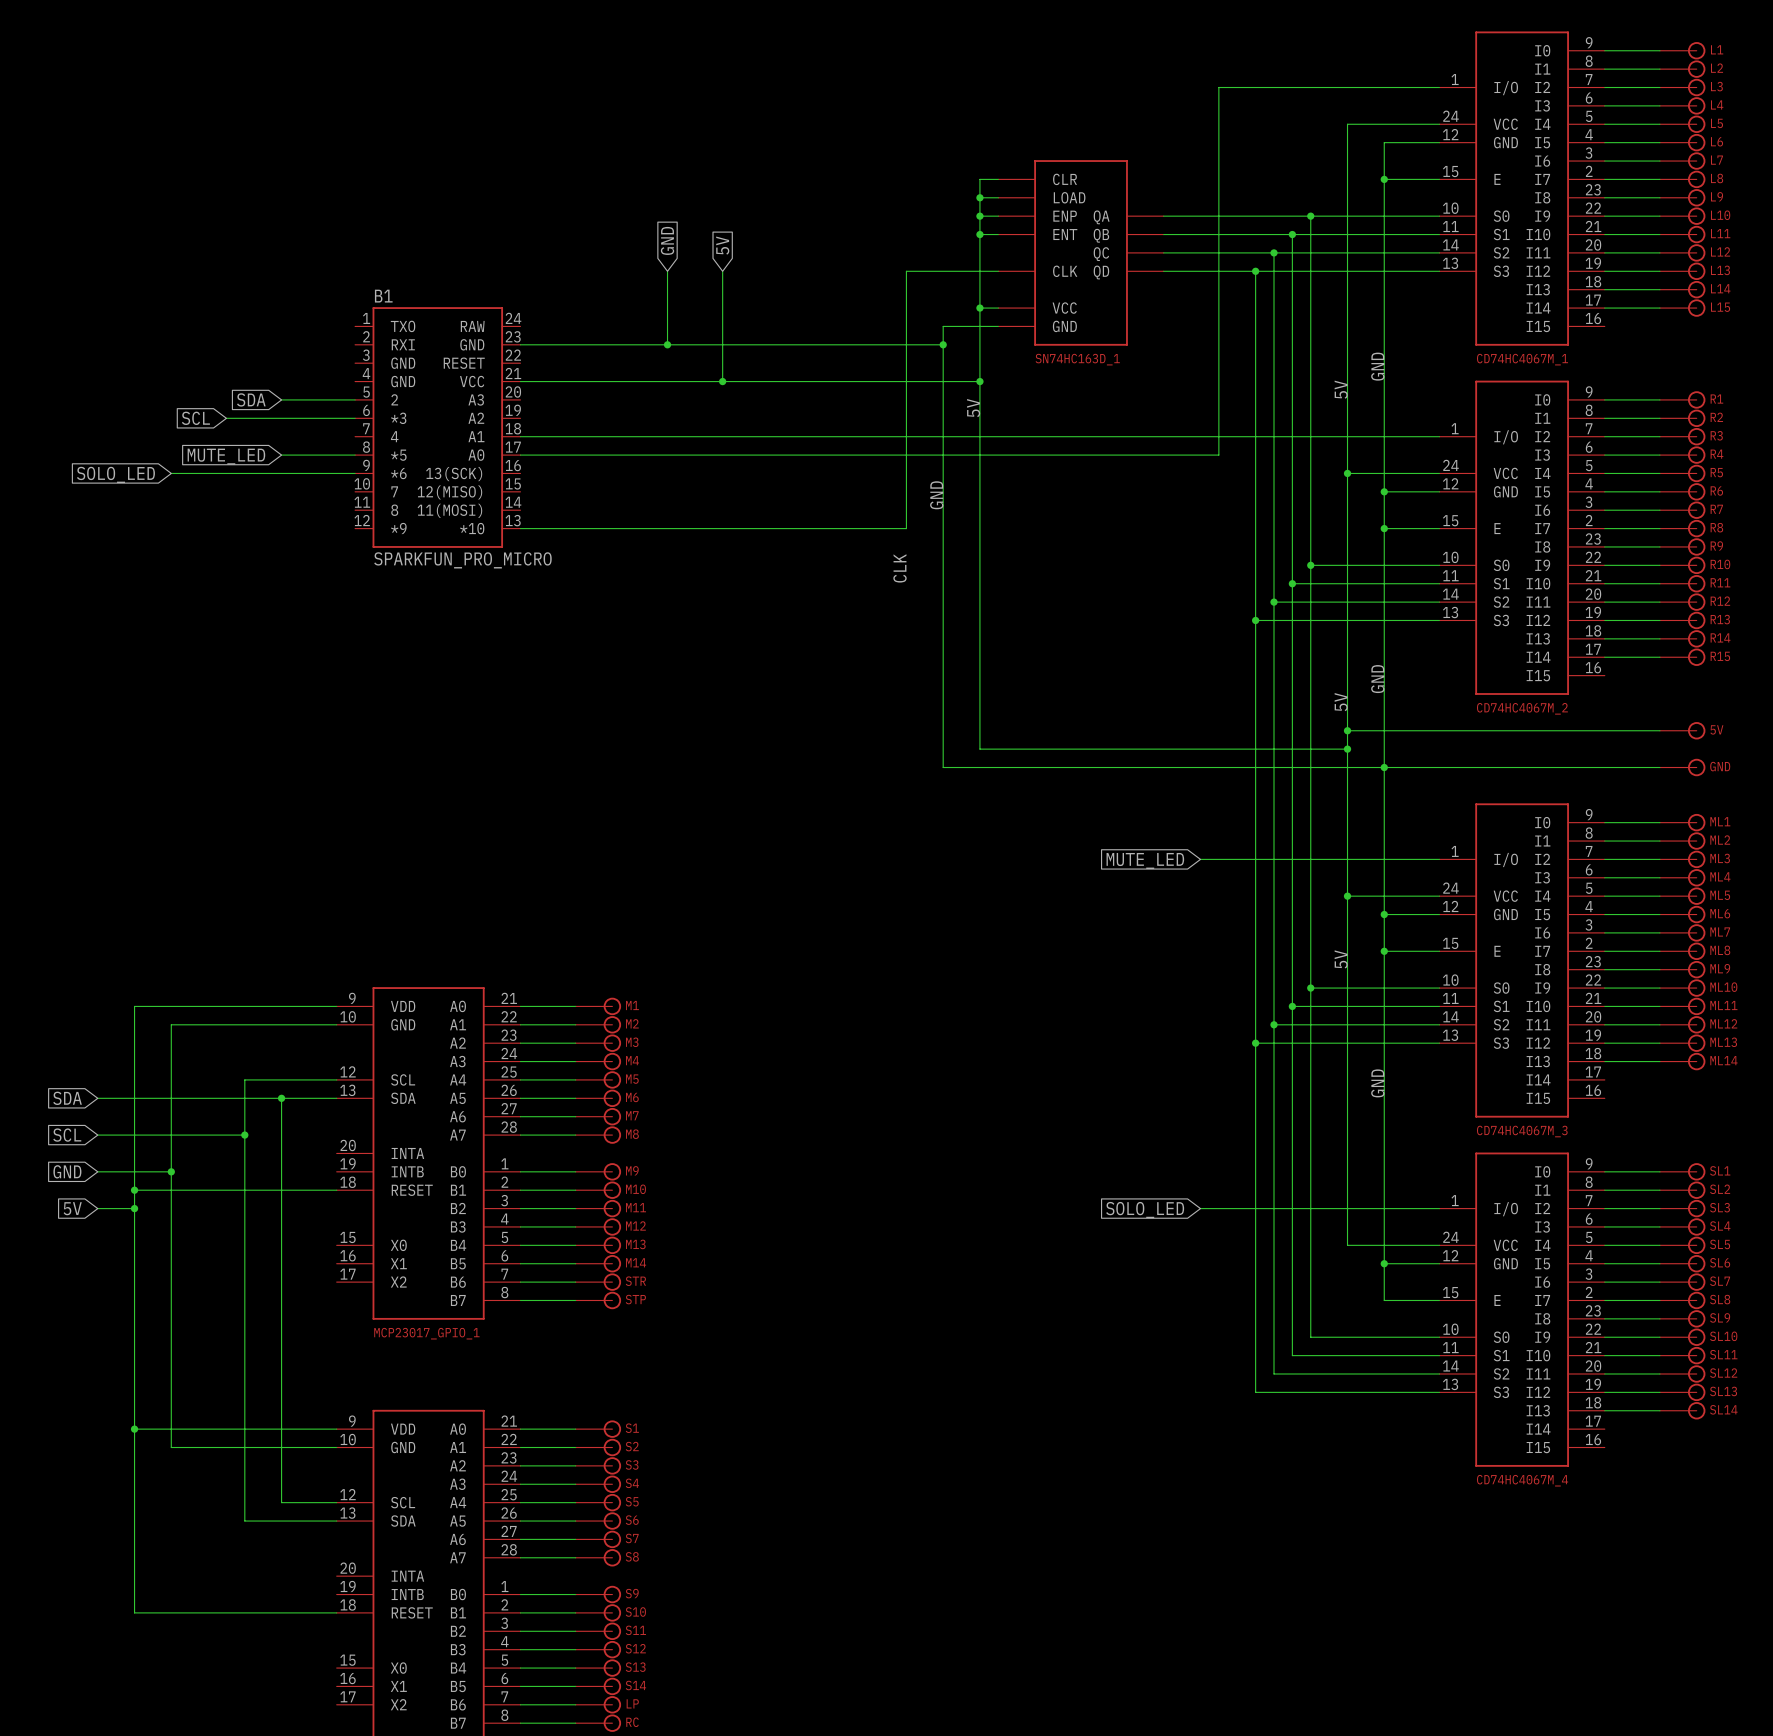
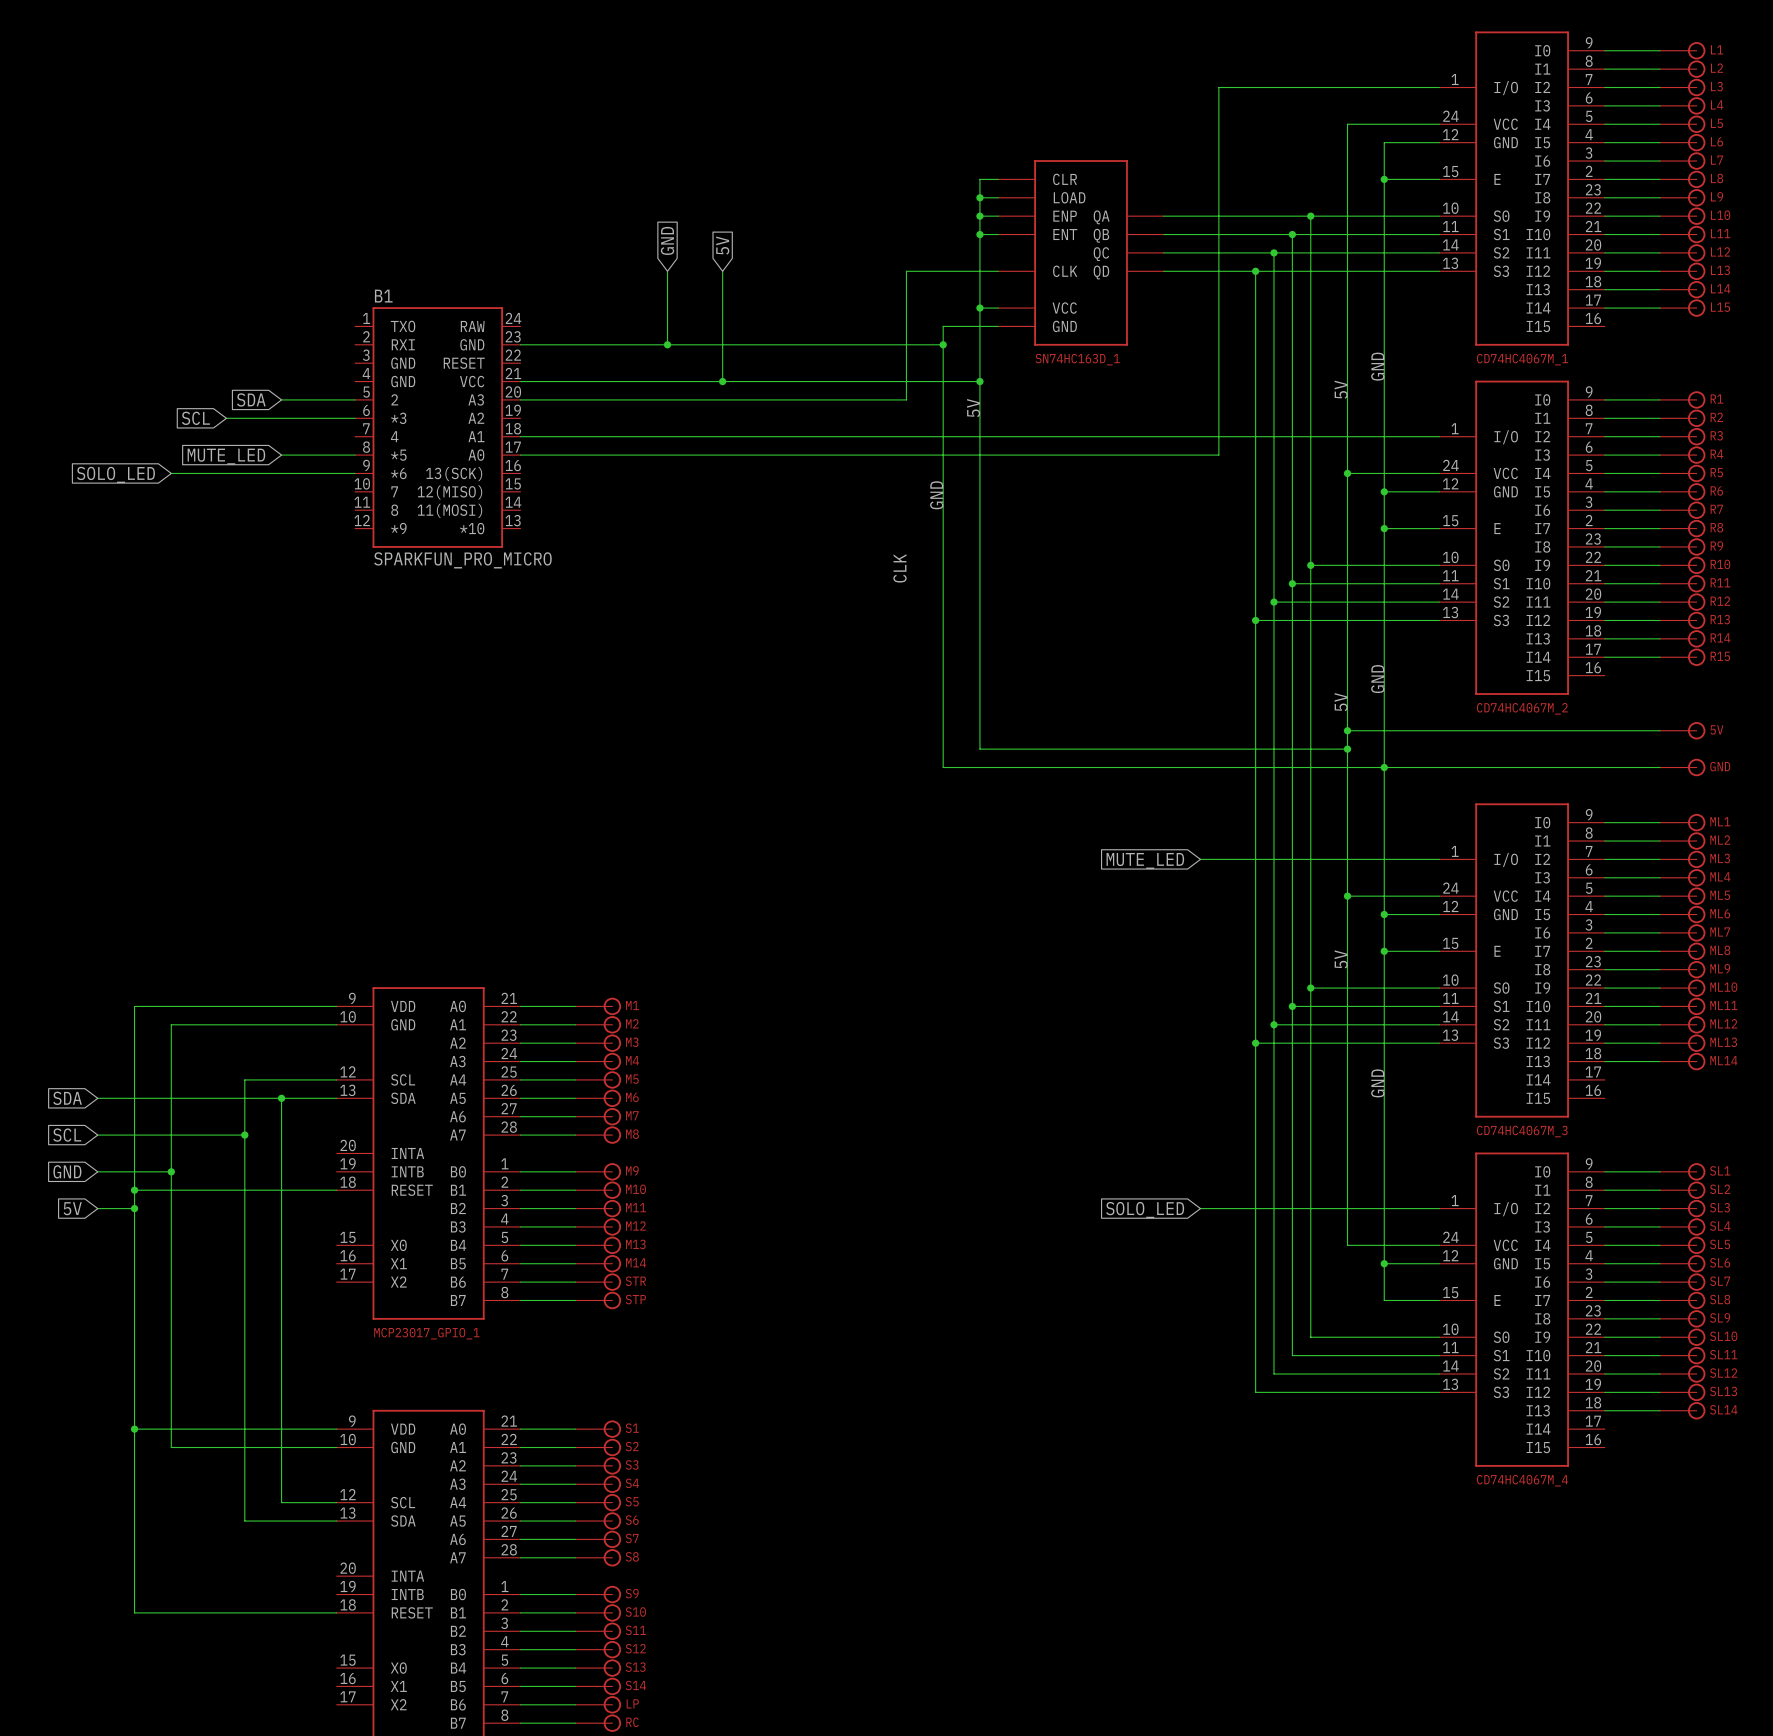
wire: (906, 399) (906, 528) (520, 528) -> (906, 399) (520, 399)

